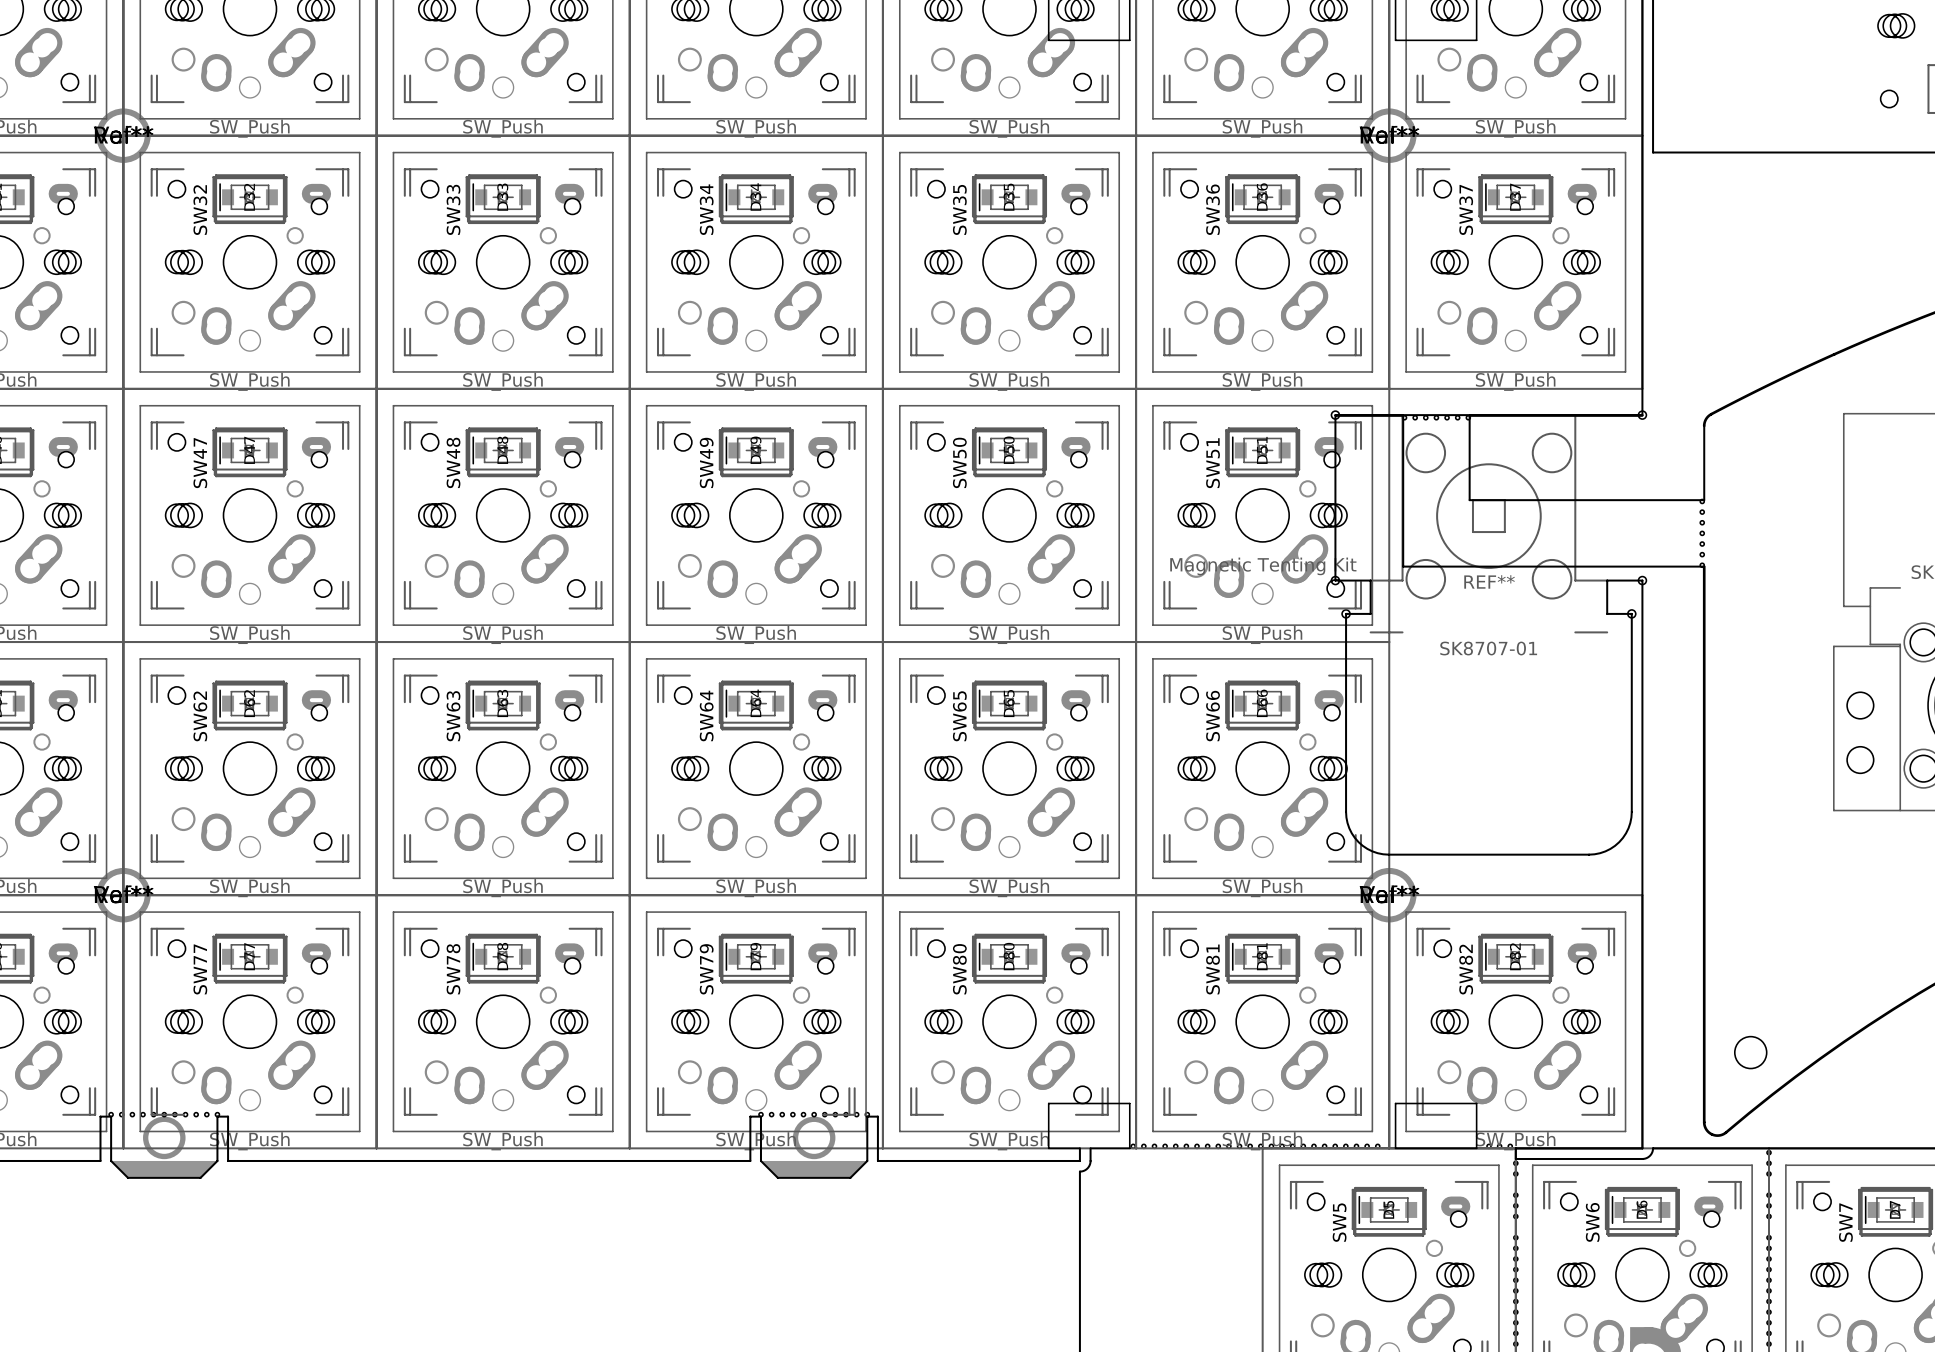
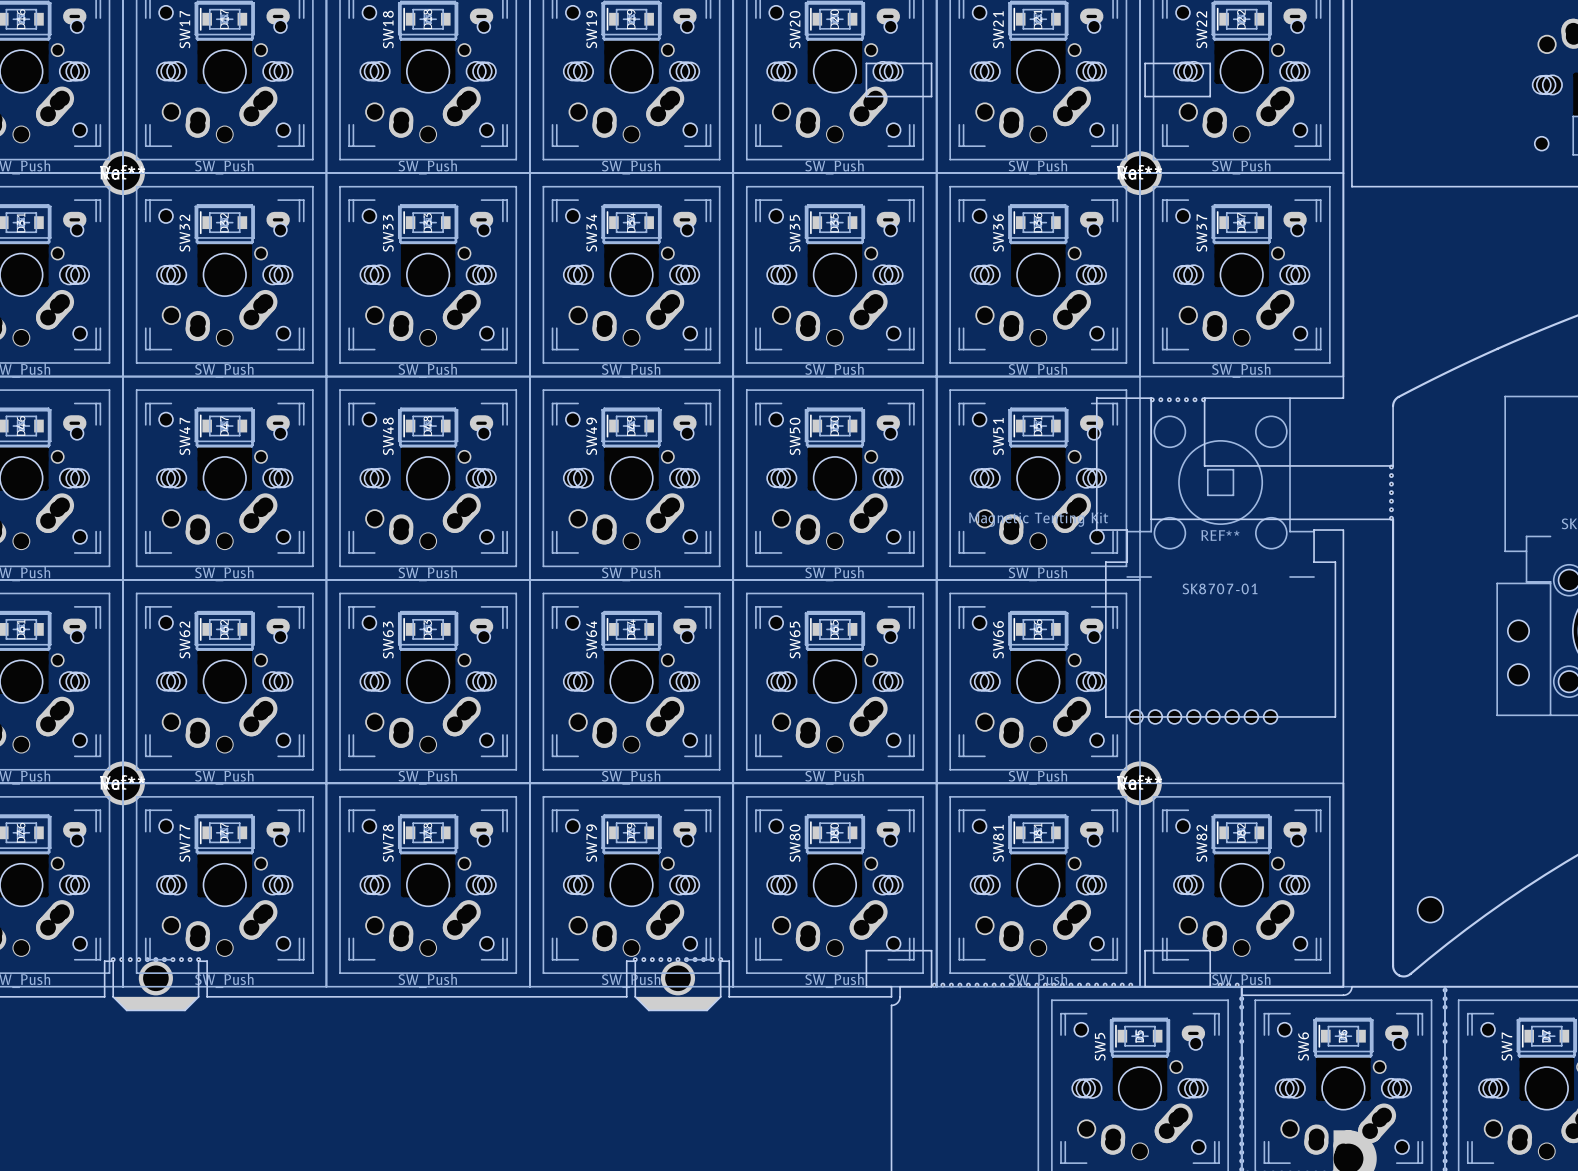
REF**: none -> SK8707-01 (1220, 560)
REF**: SK8707-01 (1488, 633) -> none

